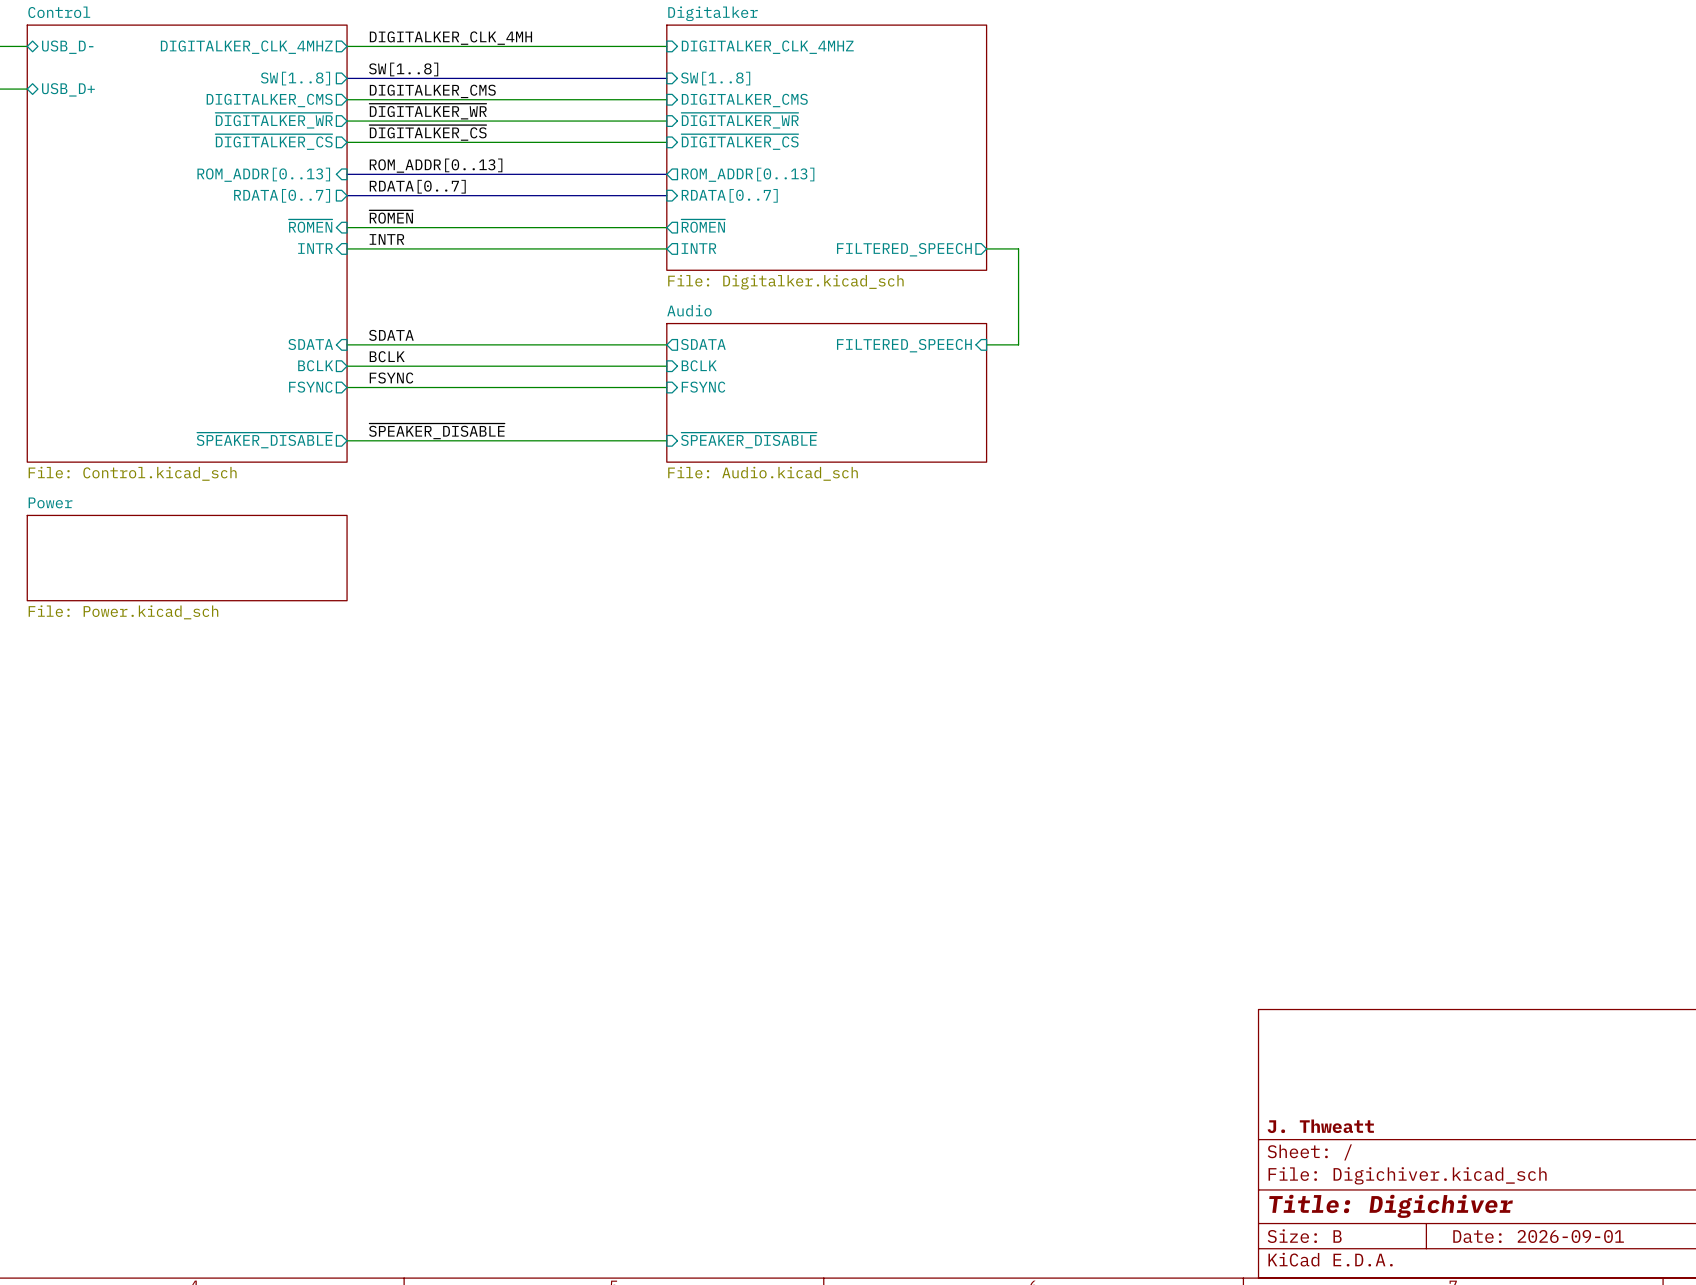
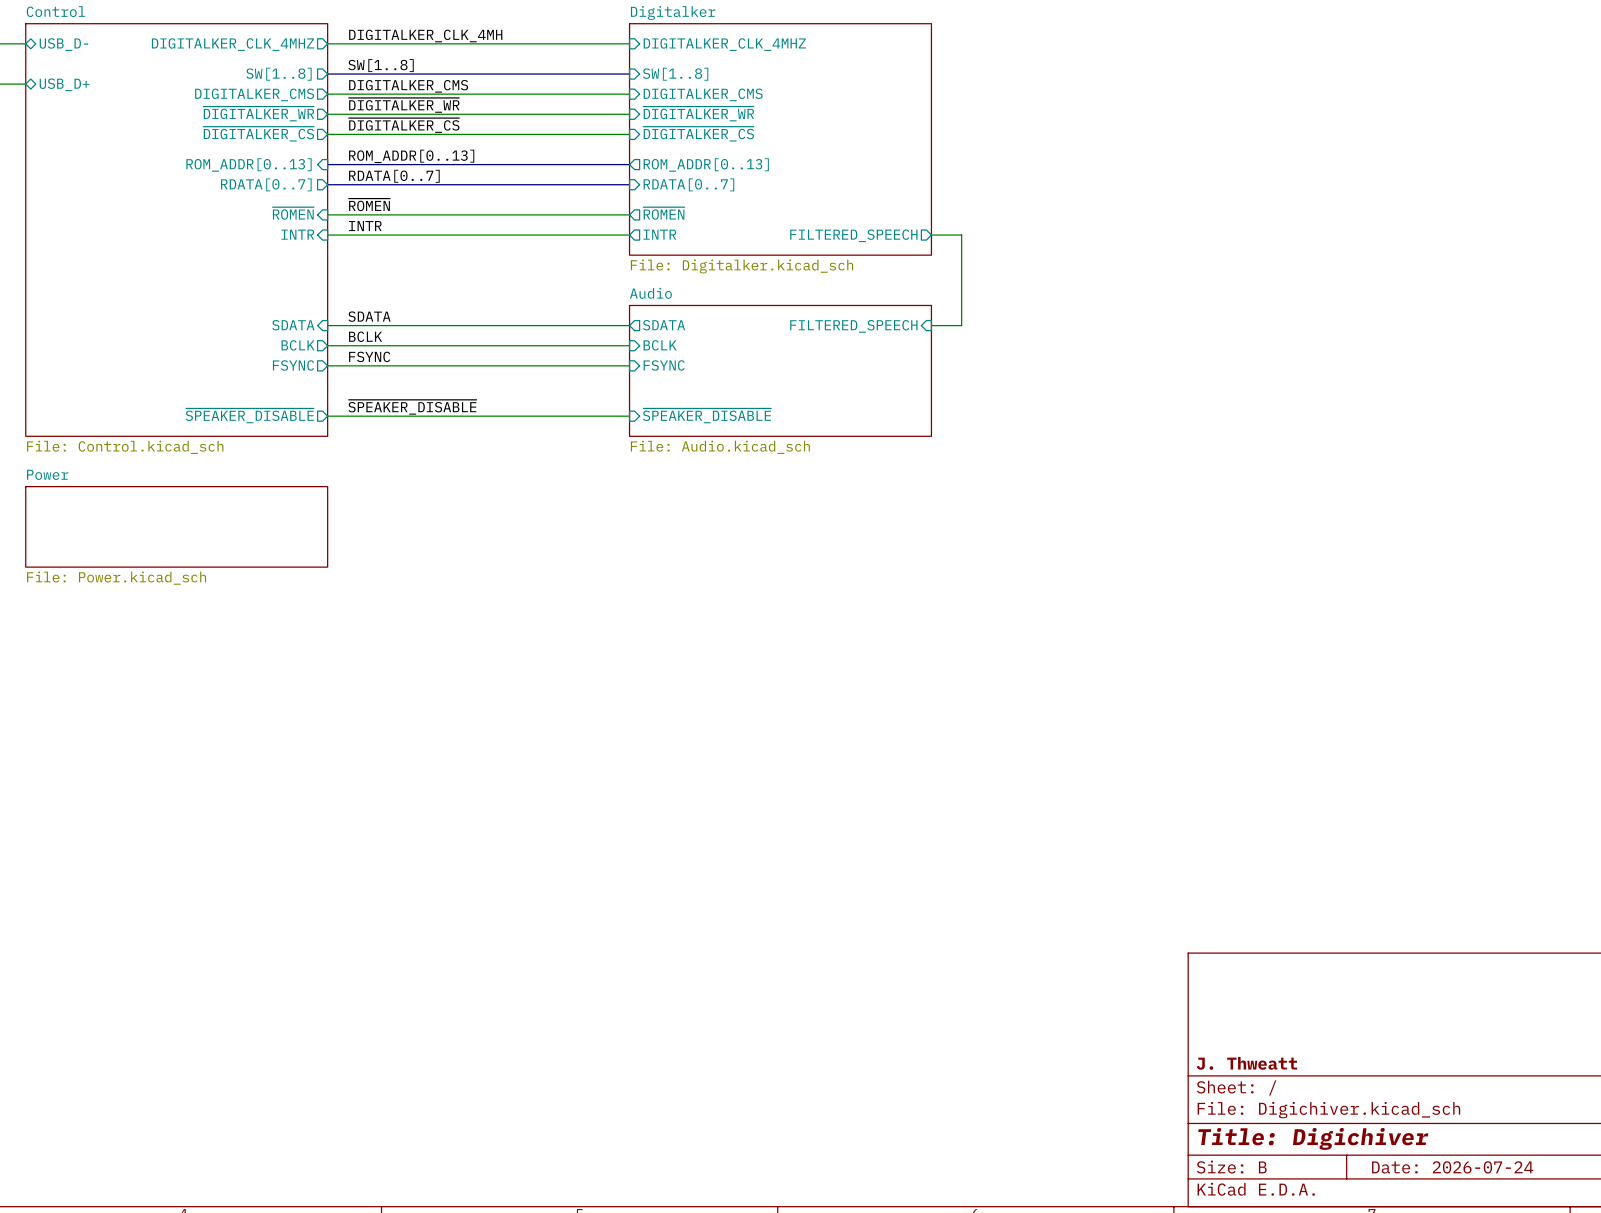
title block: Date: 2026-09-01 (1538, 1236) -> Date: 2026-07-24 (1452, 1167)

